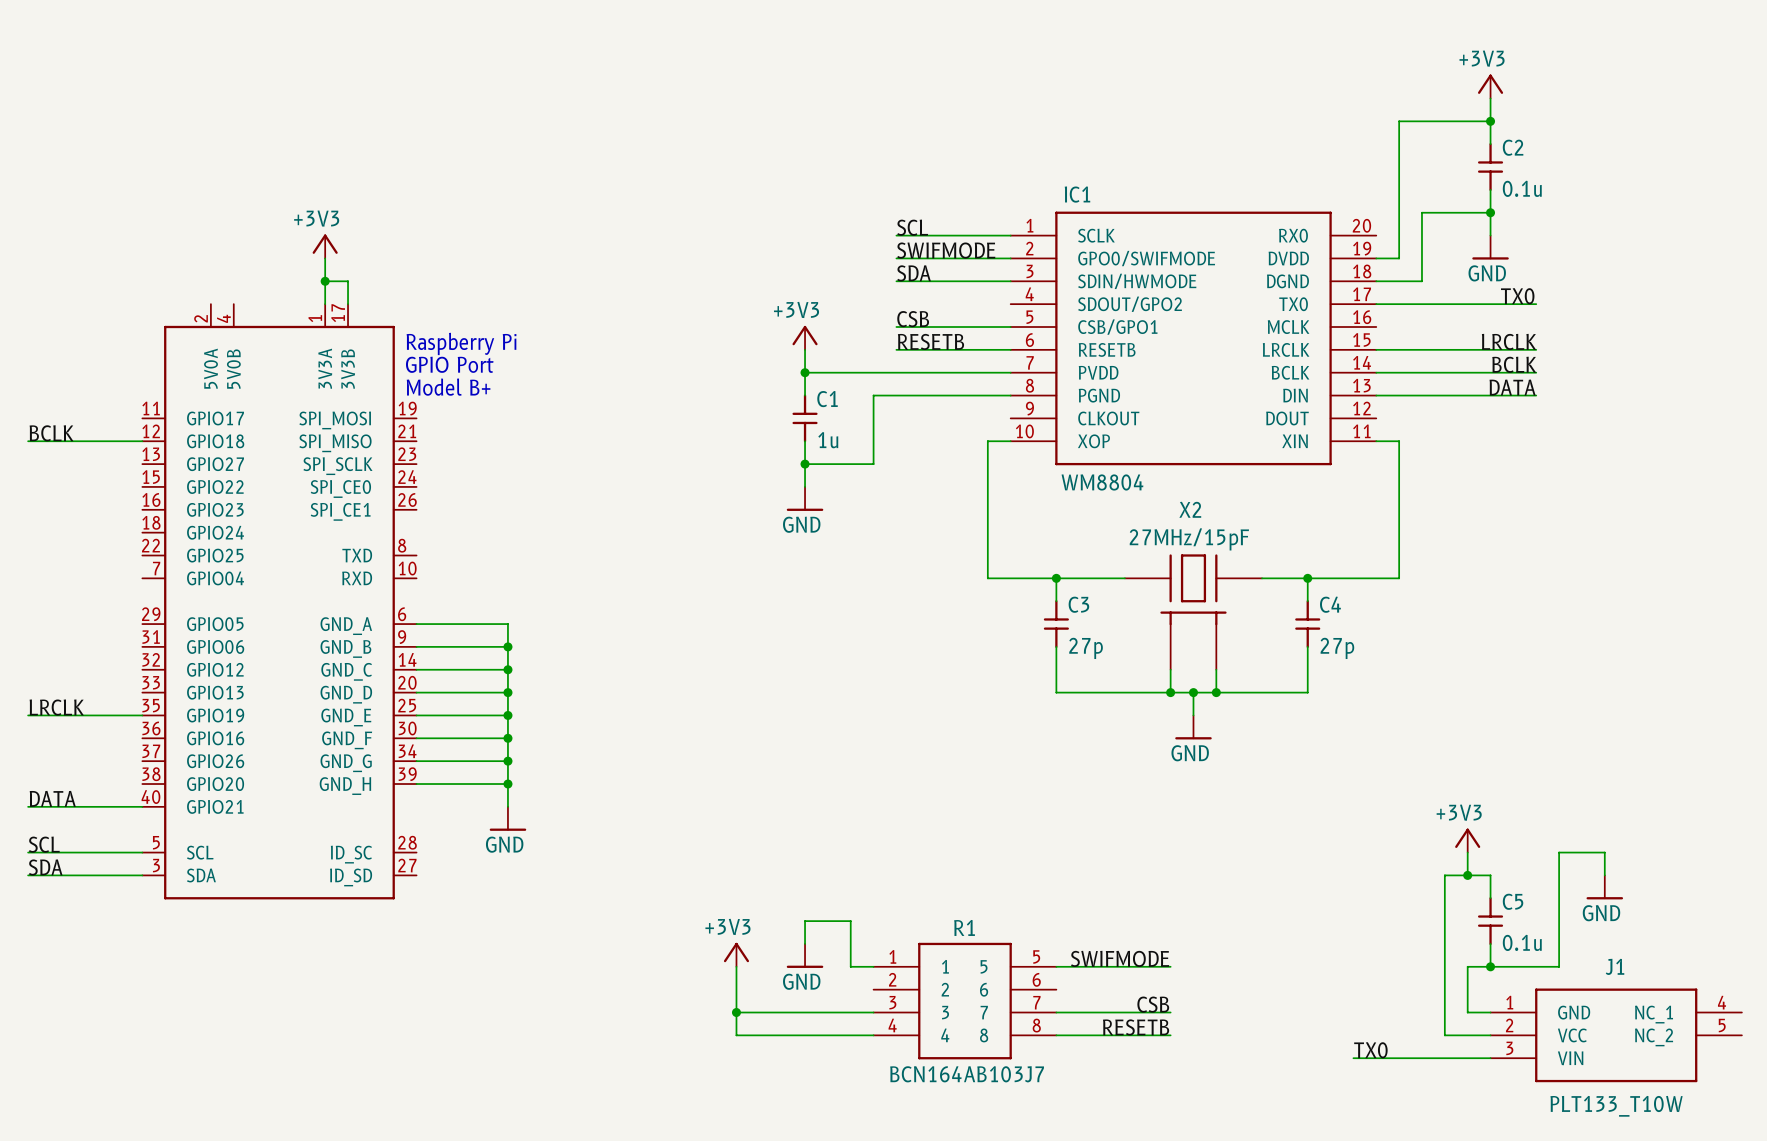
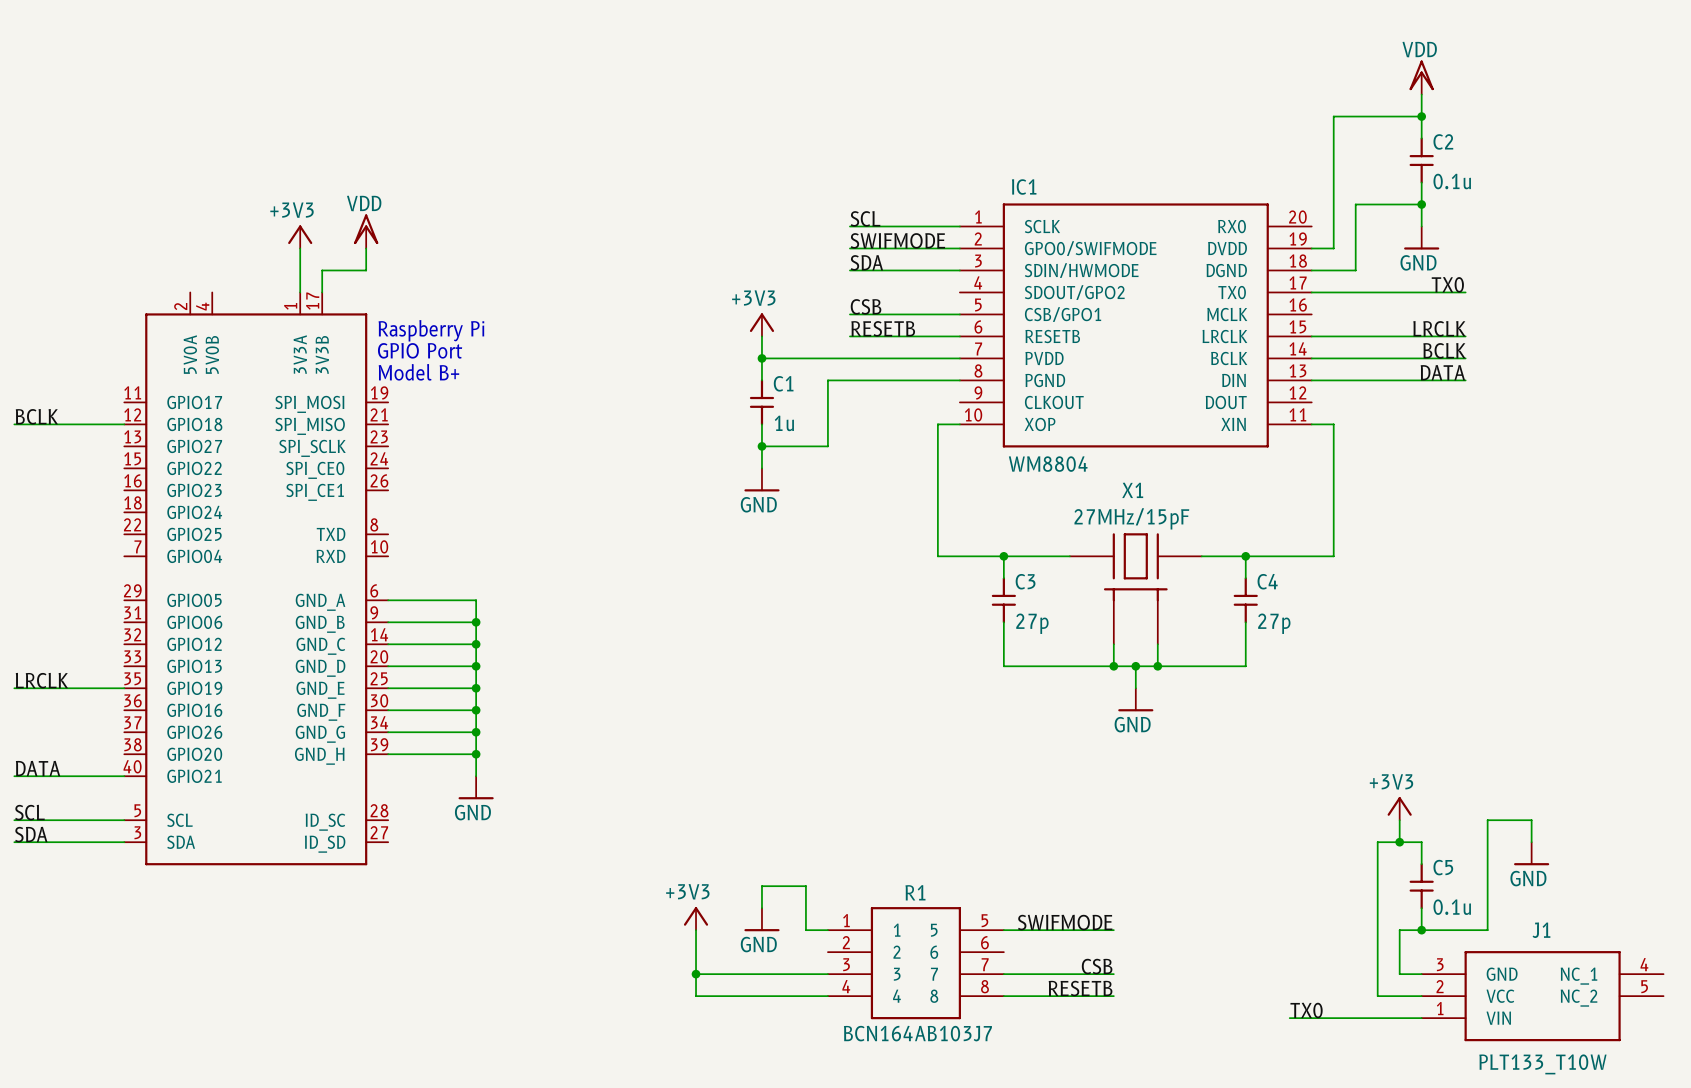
power symbol: +3V3 (1490, 86) -> VDD (1421, 77)
power symbol: none -> VDD (366, 231)
wire: (325, 281) (348, 281) -> (366, 248) (366, 270) (322, 270)
junction: (325, 281) -> none
X2 name: X2 (1190, 509) -> X1 (1132, 490)
J1 pin number: 1 (1509, 1002) -> 3 (1440, 964)
J1 pin number: 3 (1509, 1048) -> 1 (1440, 1008)

